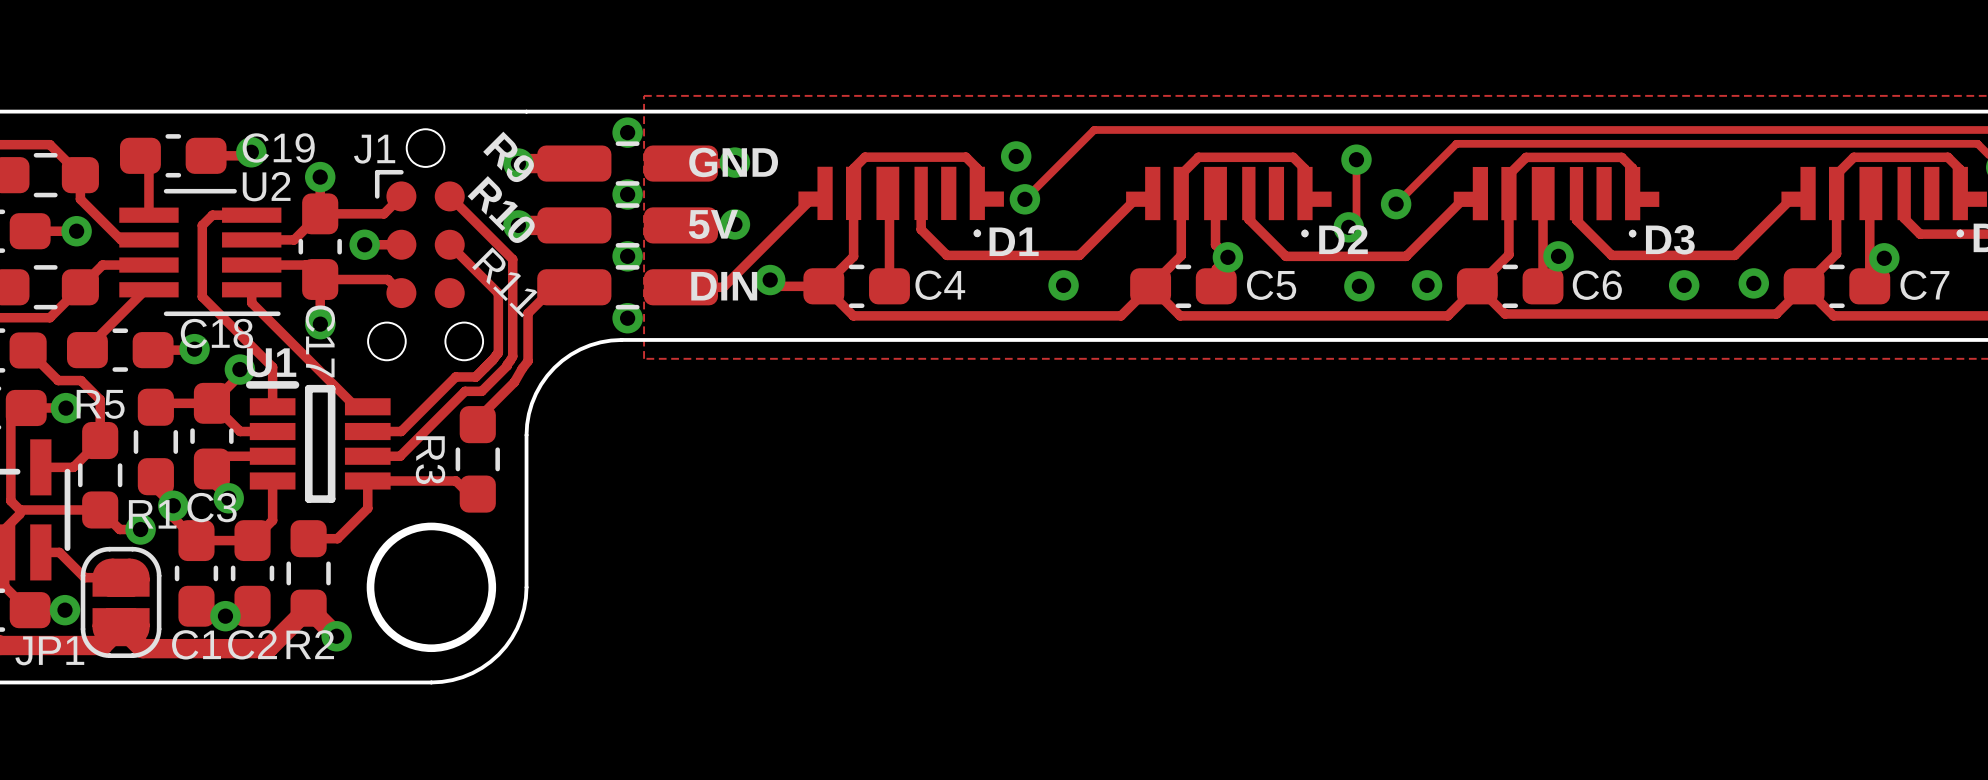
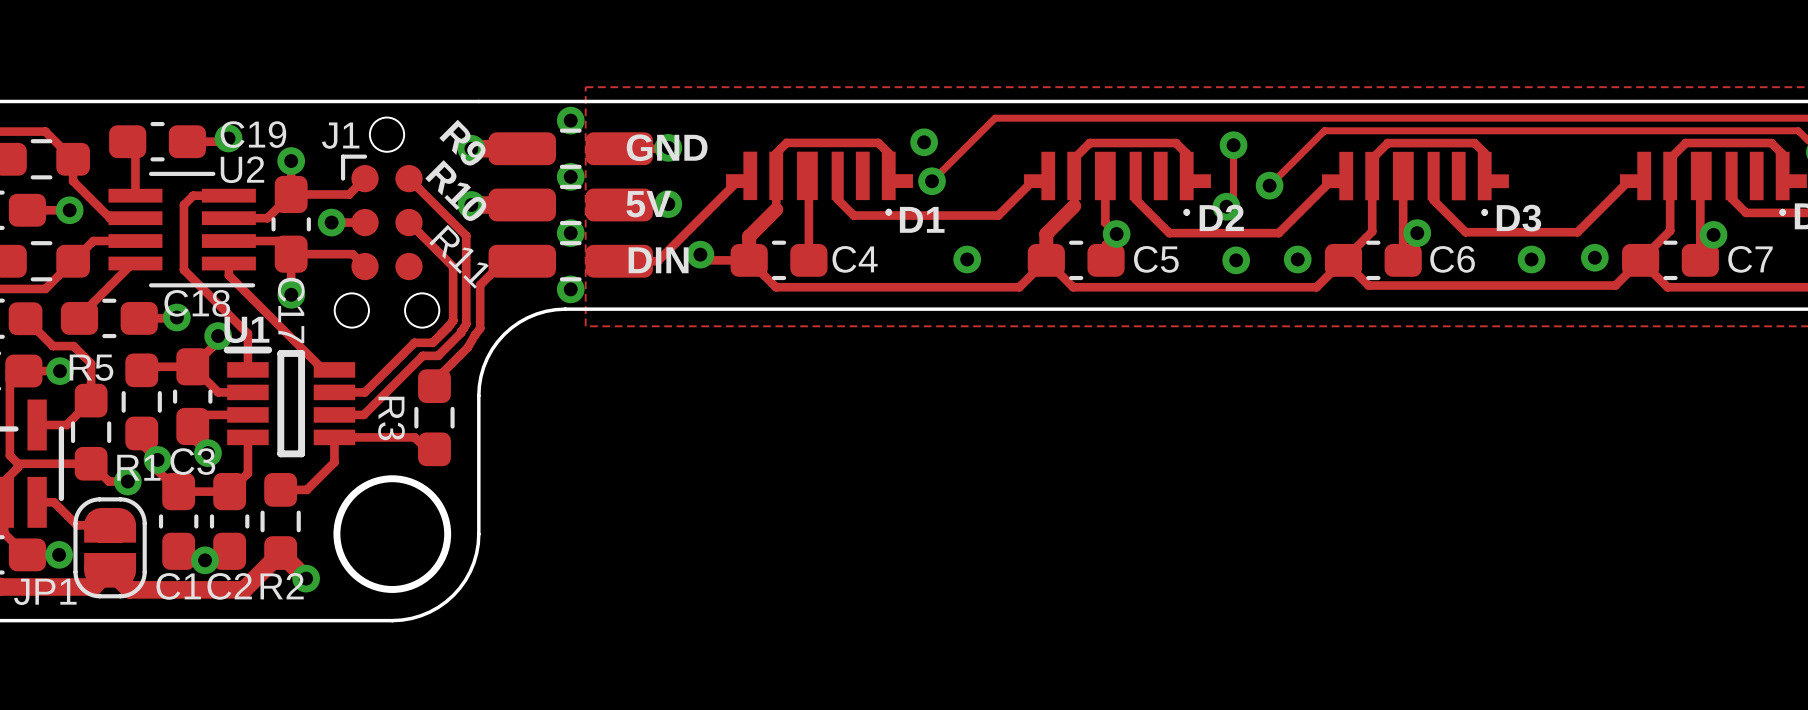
track: (921, 219) (921, 229) (946, 255) (1079, 255) (1097, 237) -> (837, 199) (853, 215) (998, 215)
track: (1181, 226) (1181, 255) (1150, 286) -> (1074, 206) (1046, 233) (1046, 260)
track: (853, 230) (853, 256) (823, 286) -> (776, 209) (749, 236) (749, 260)

